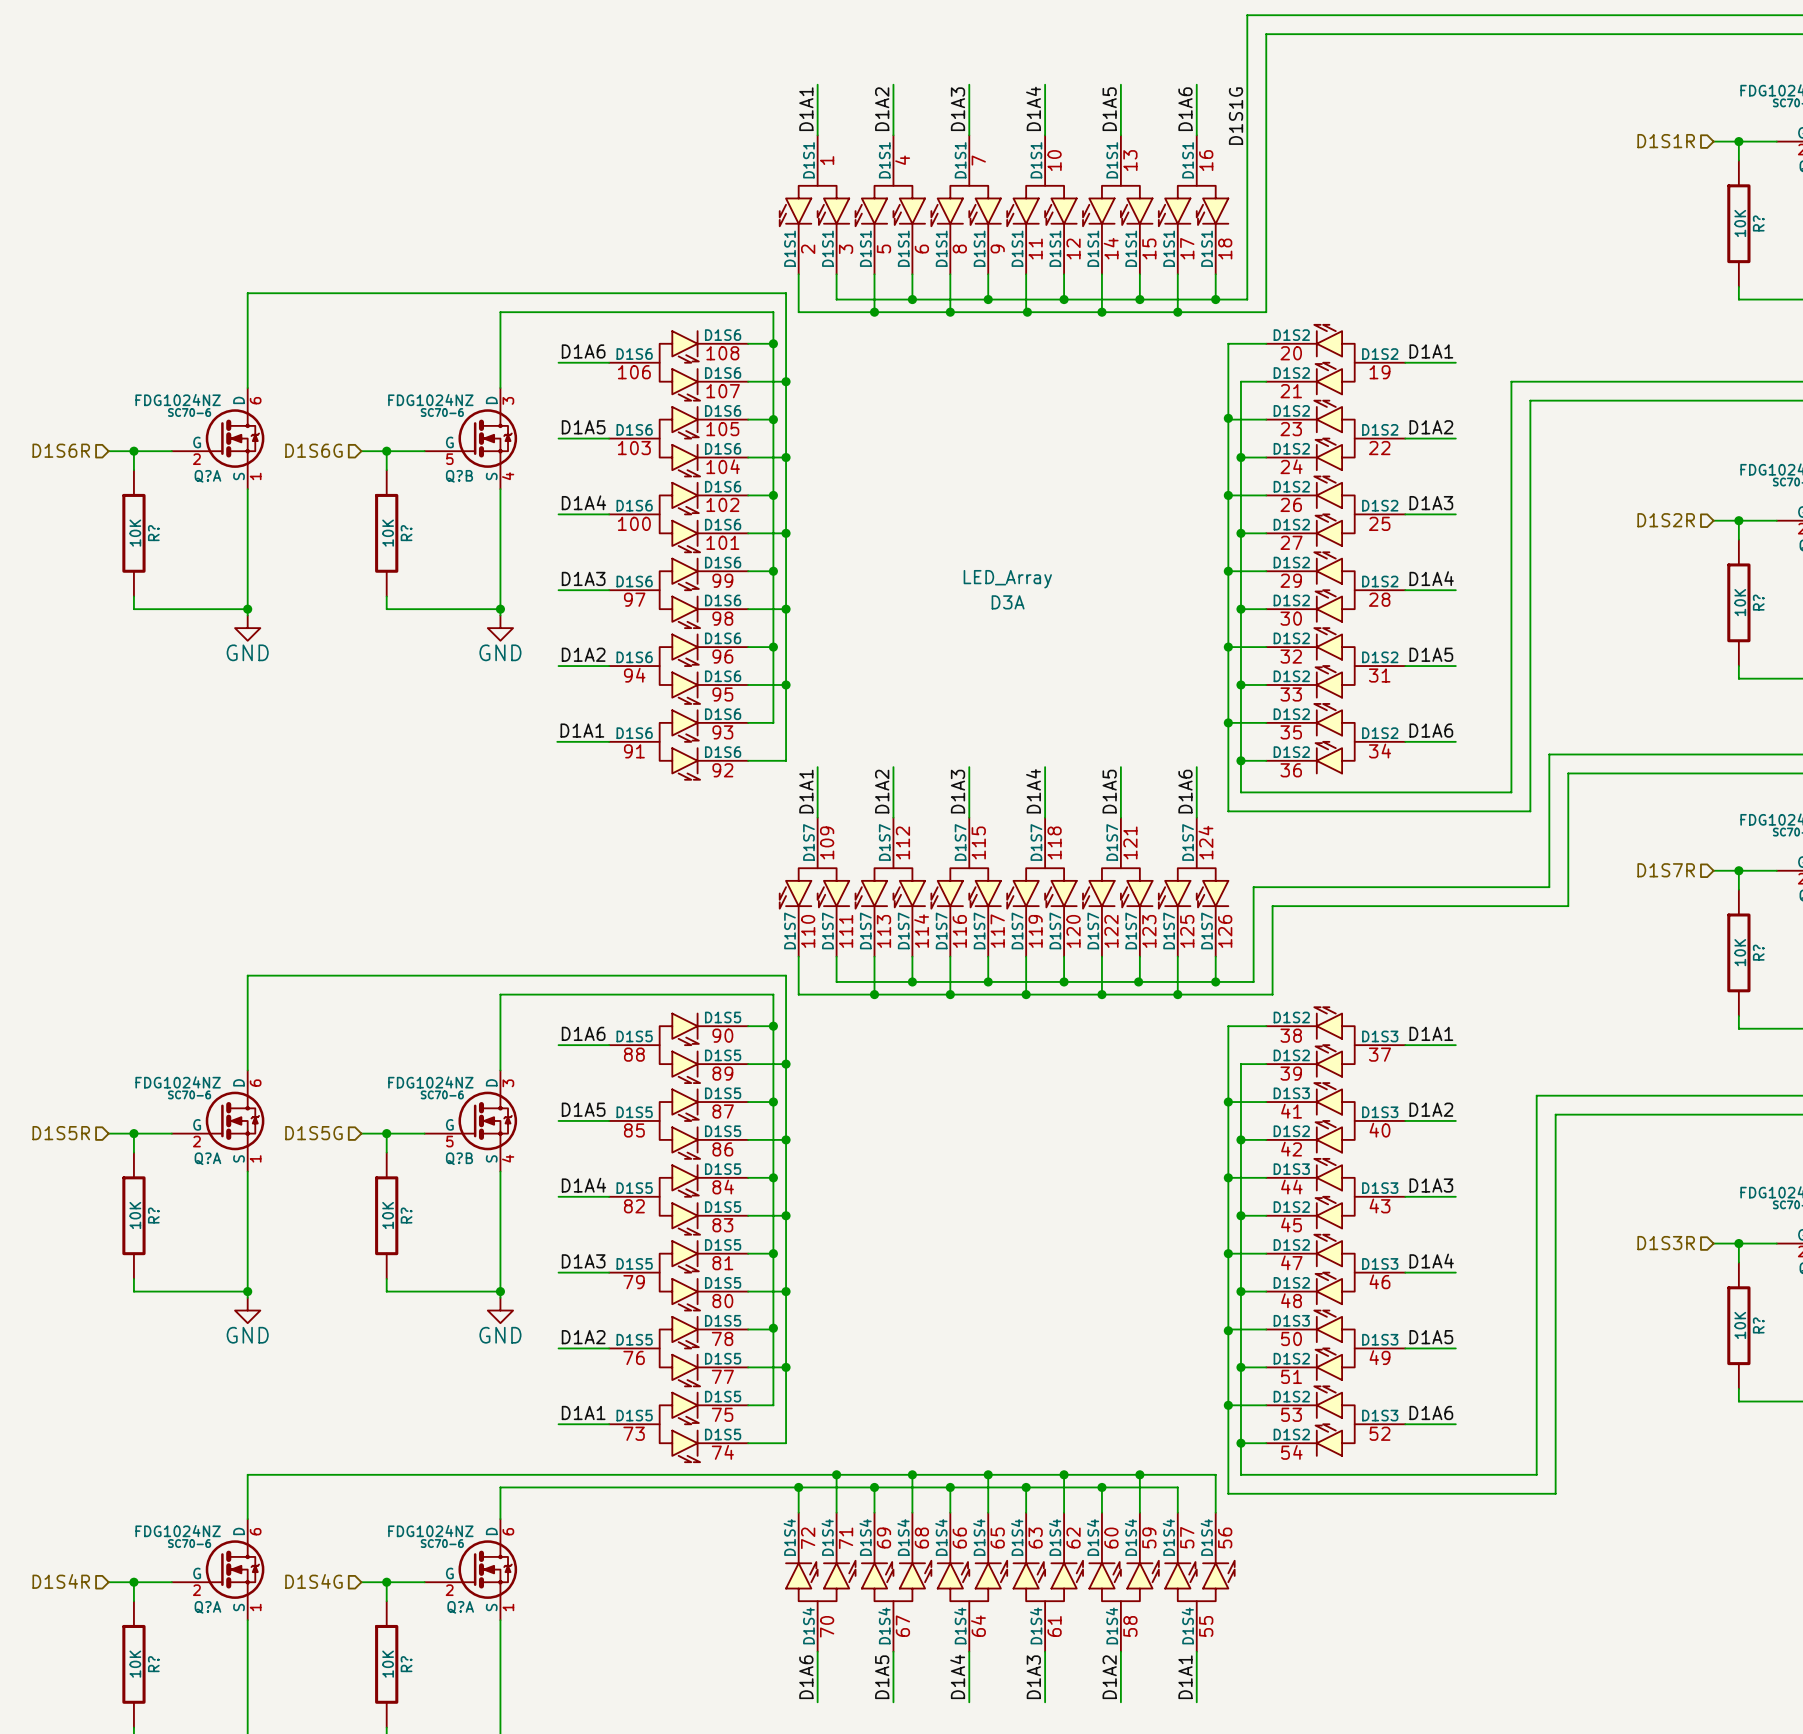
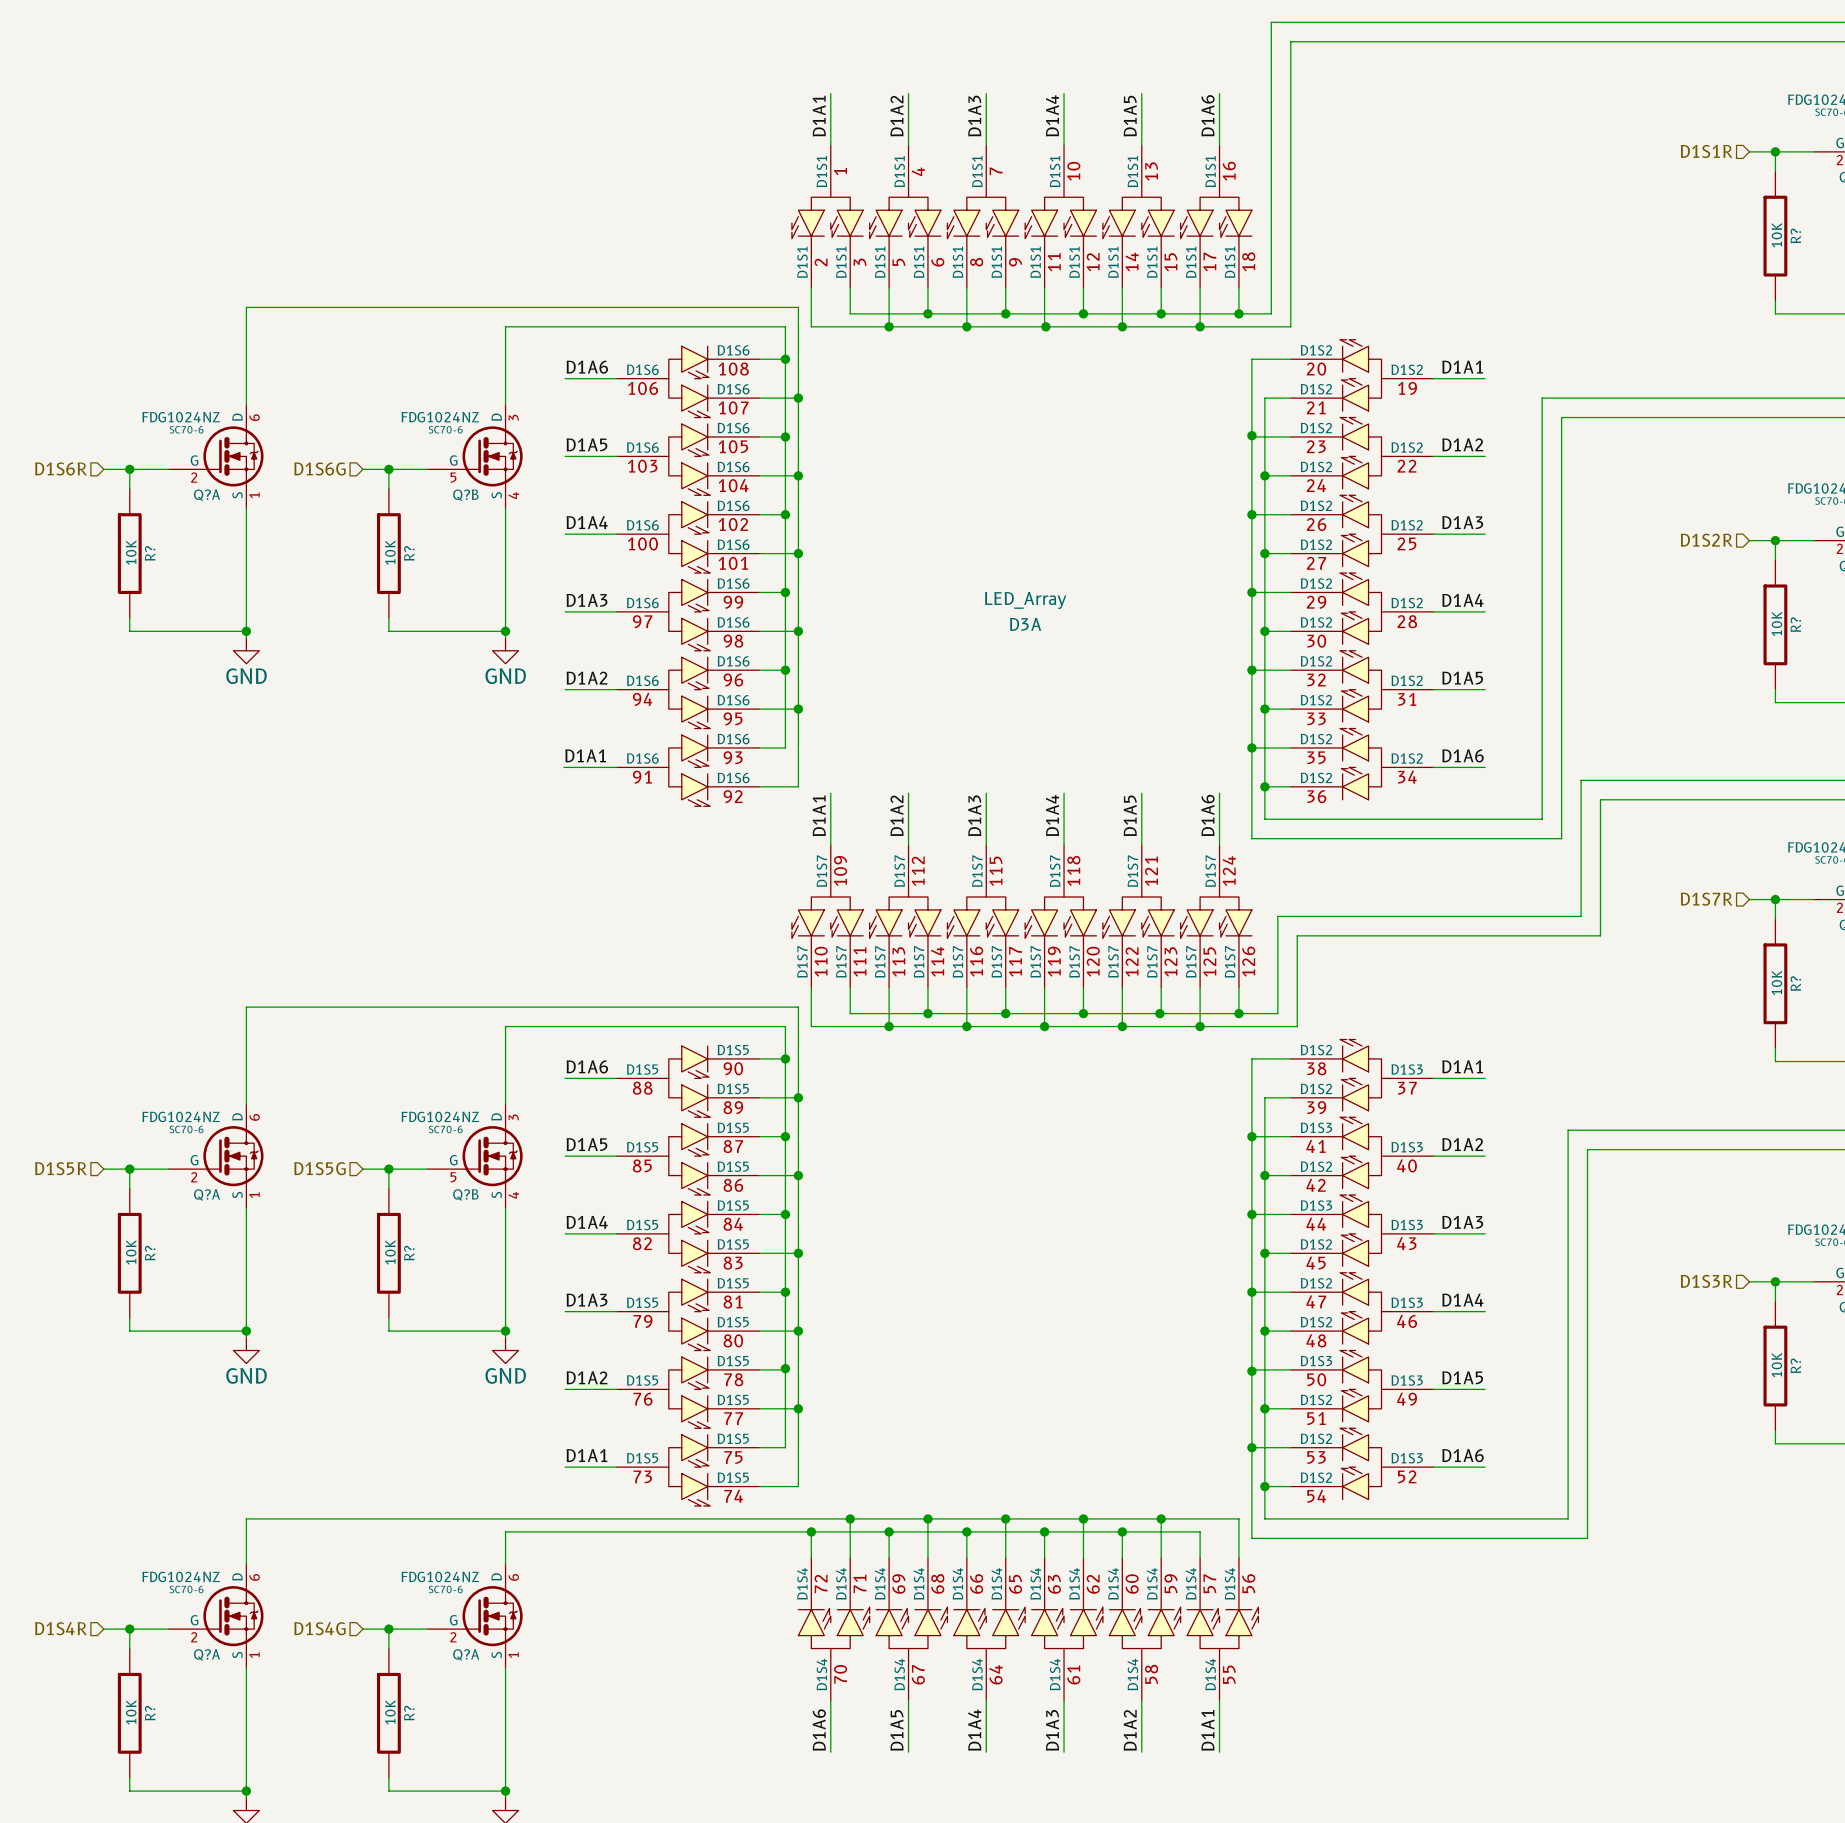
label: D1S1G (1236, 116) -> none

